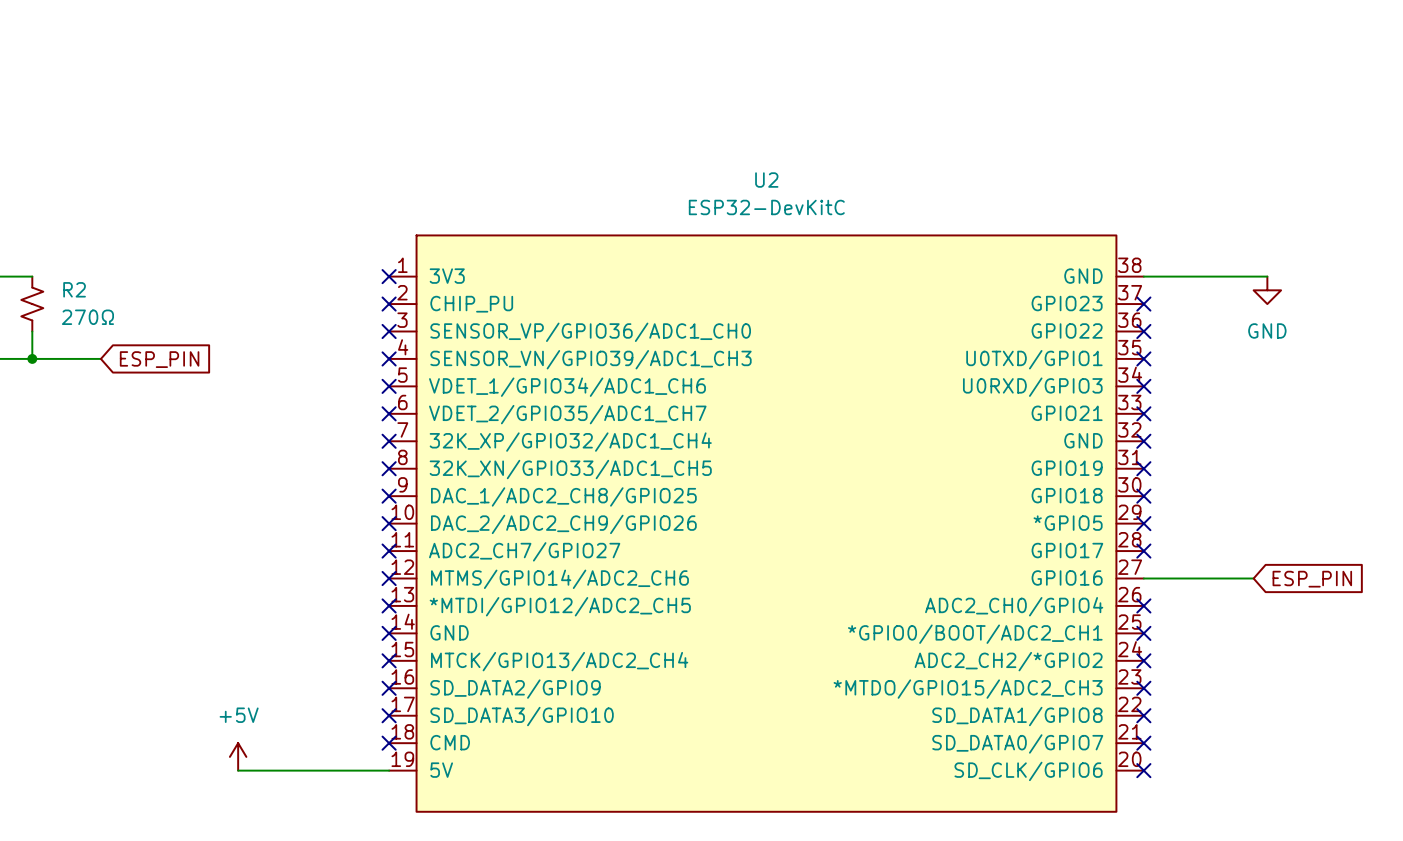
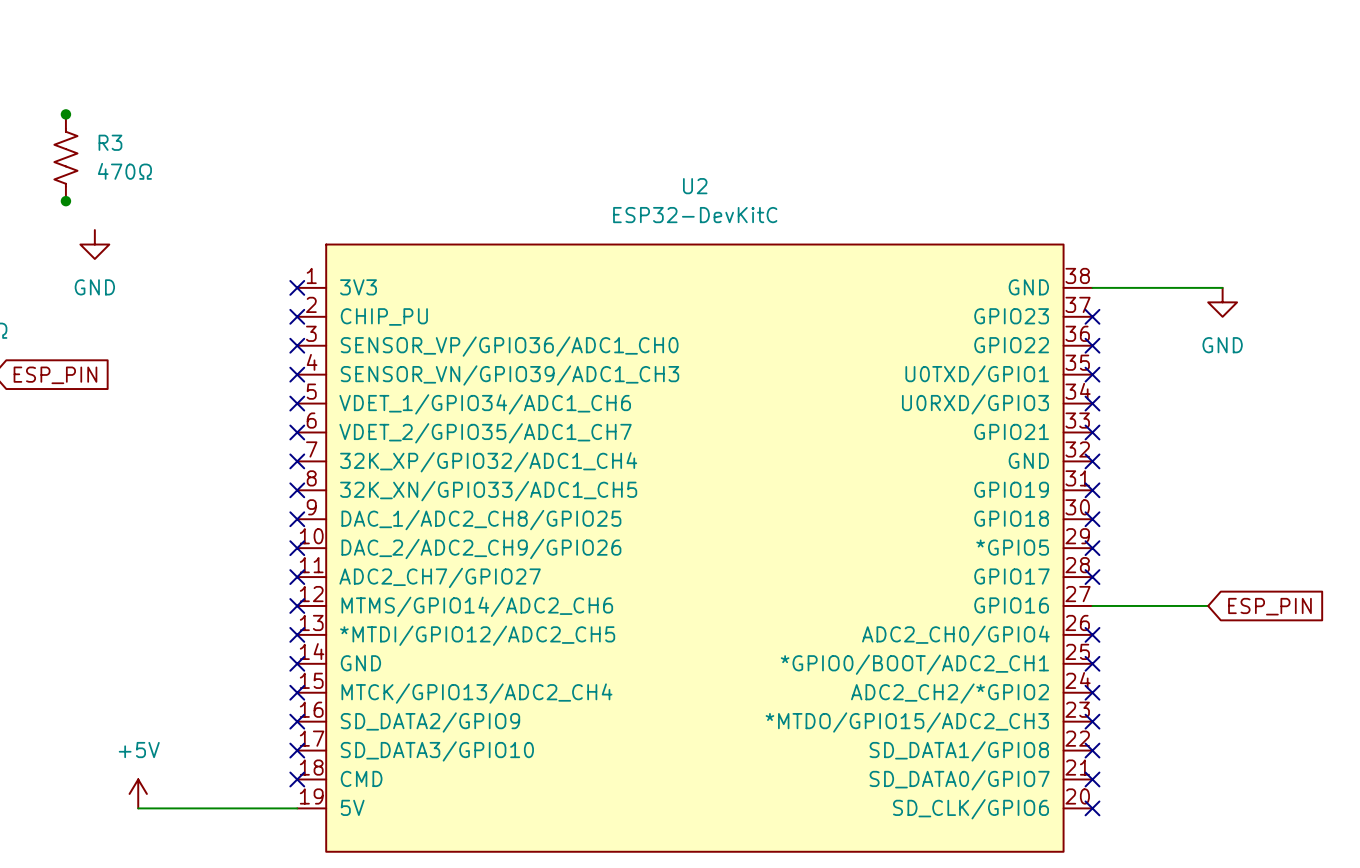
junction: none -> (65, 114)
R3: none -> 470Ω (65, 157)
junction: none -> (65, 201)
power symbol: none -> GND (94, 244)

